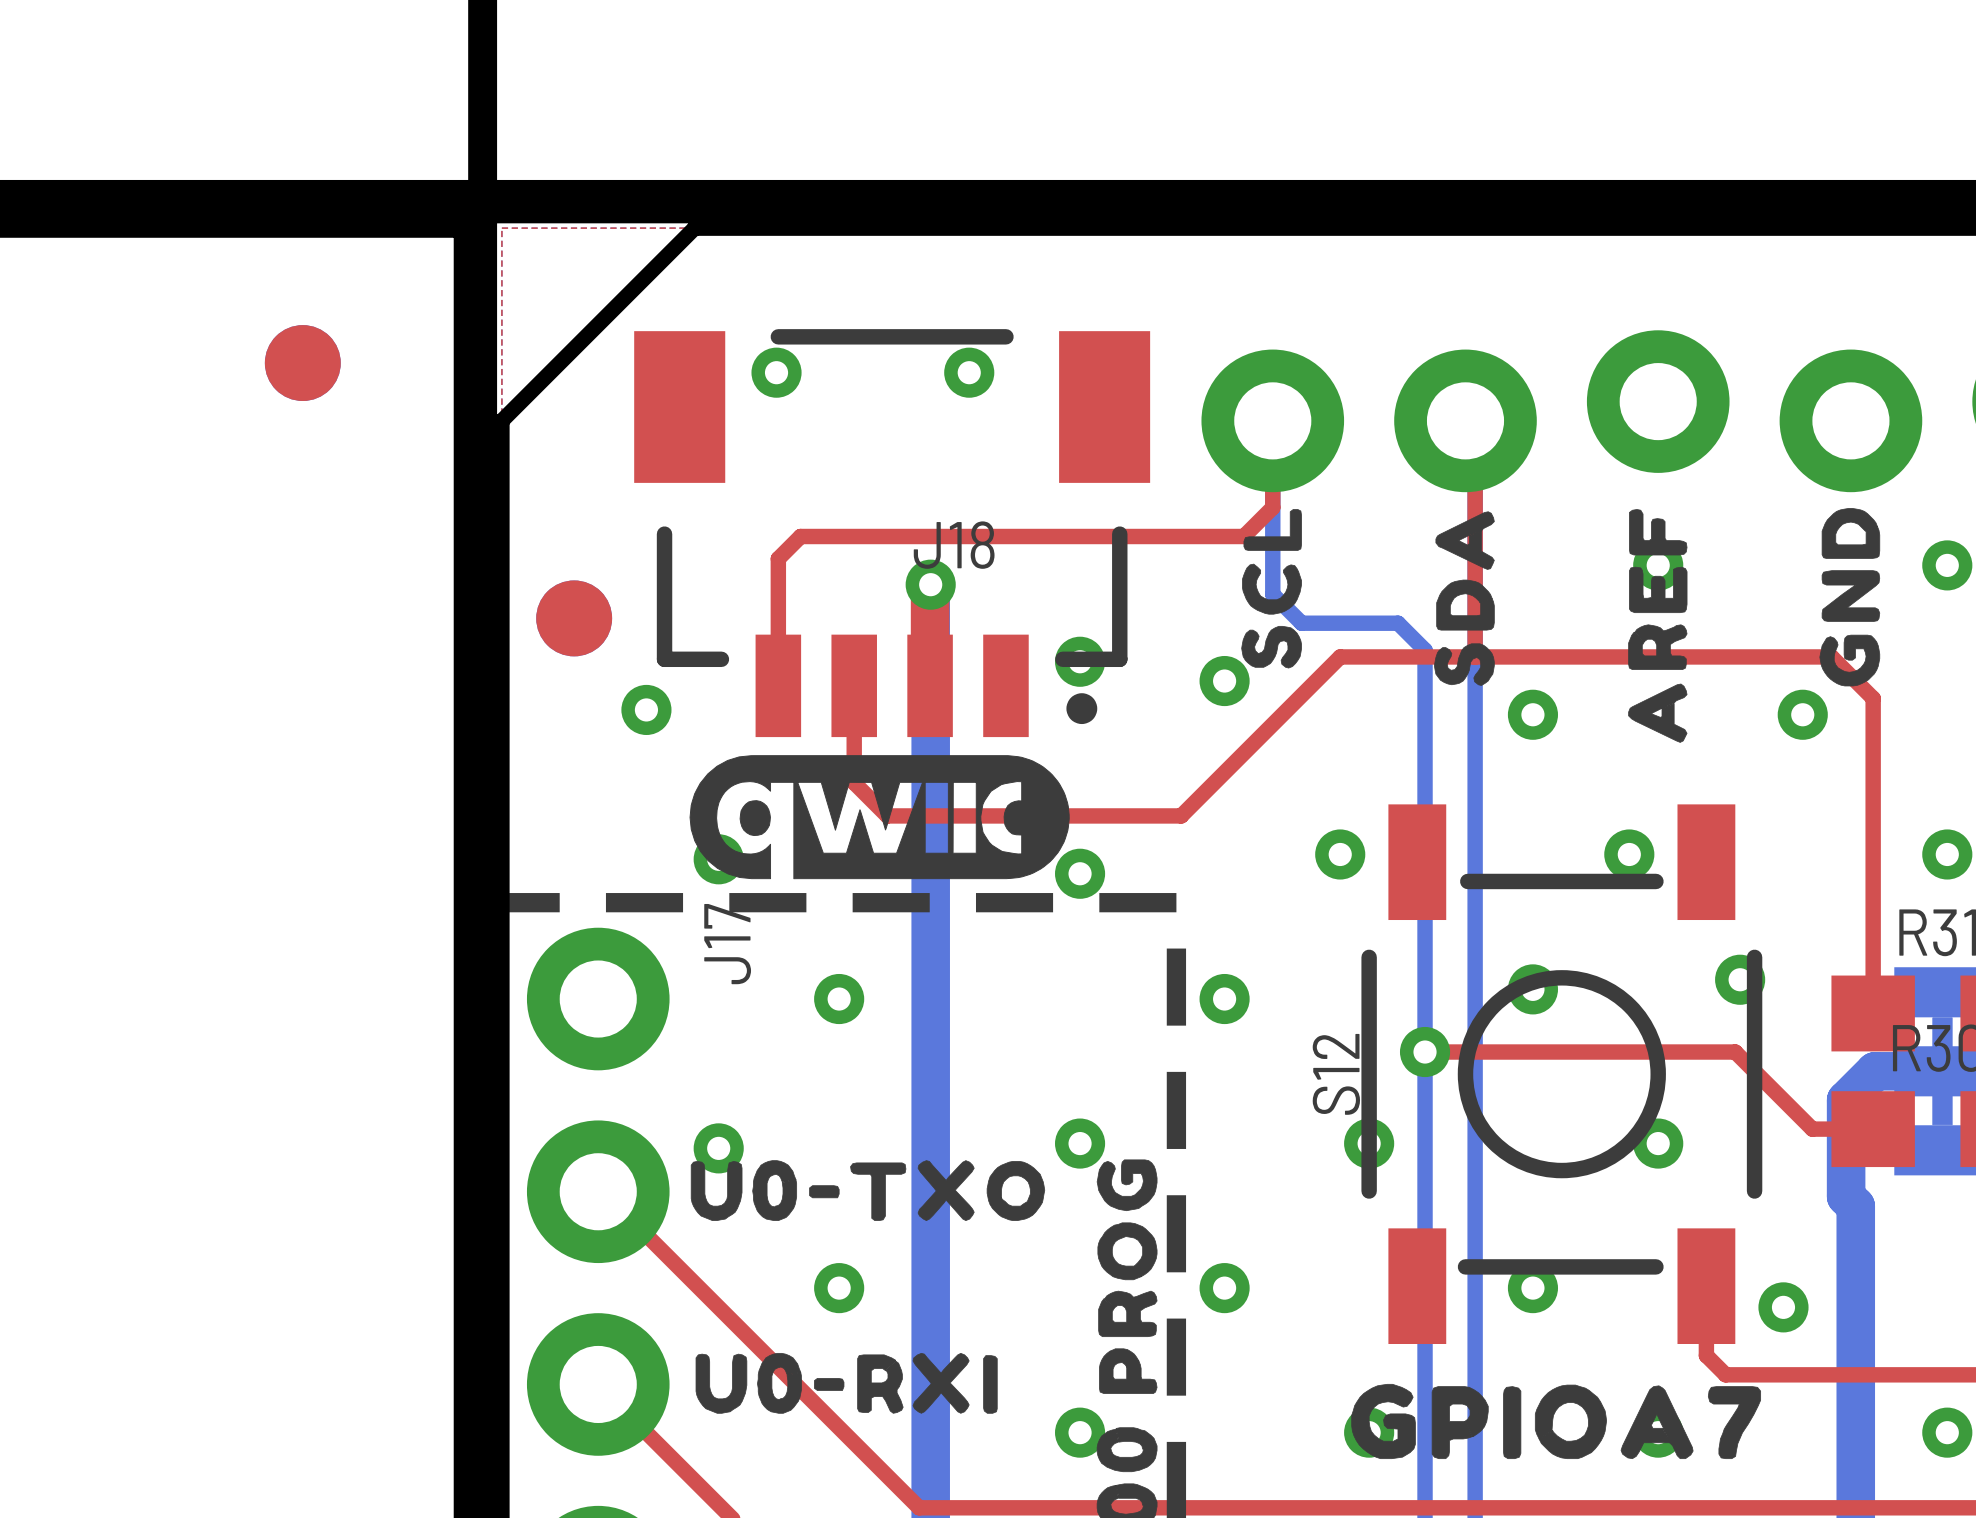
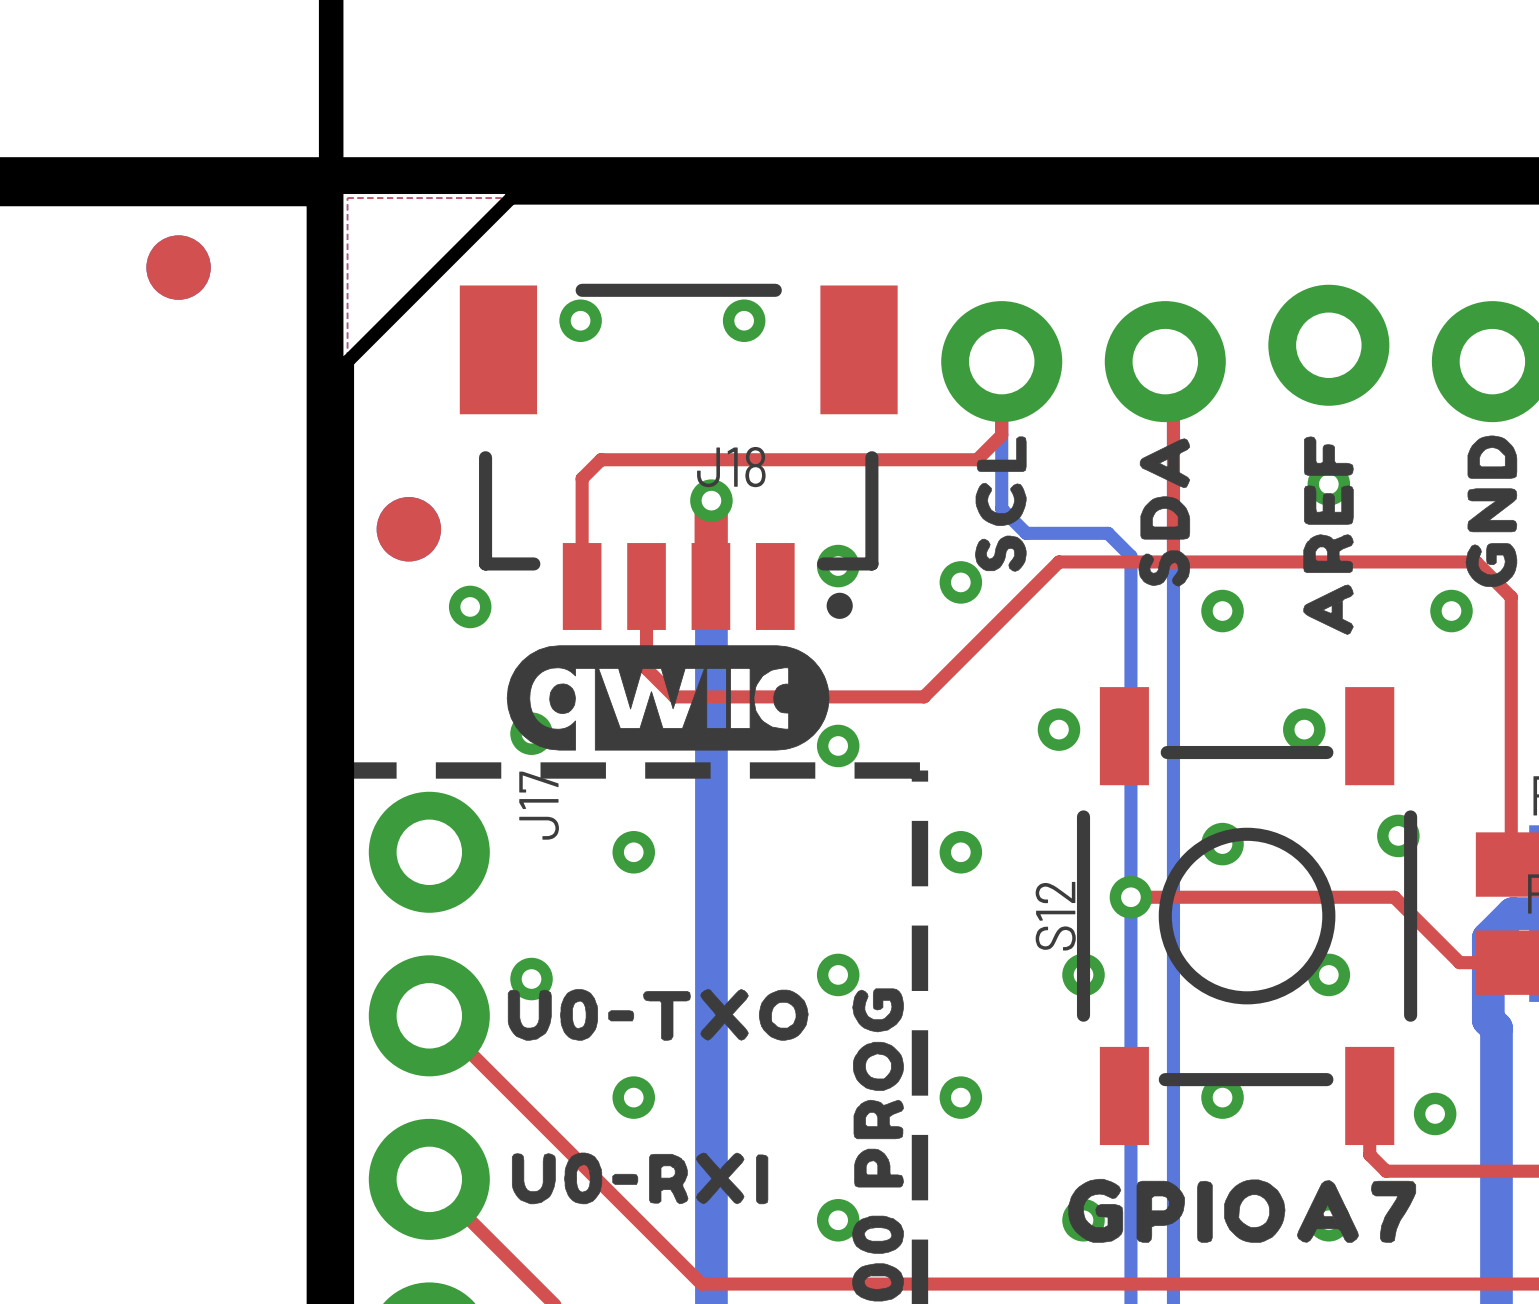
part position: (302, 363) -> (178, 267)

